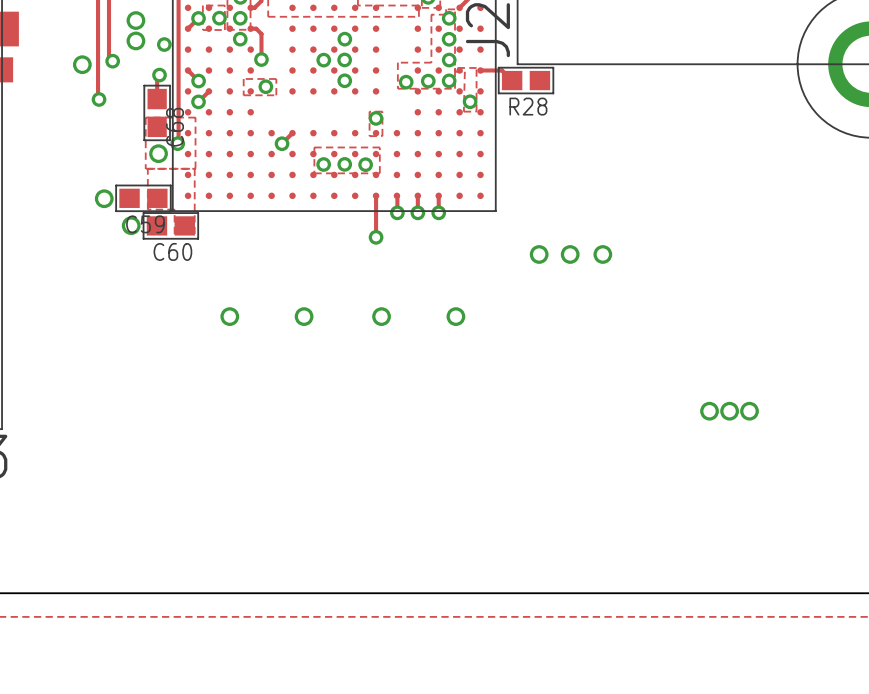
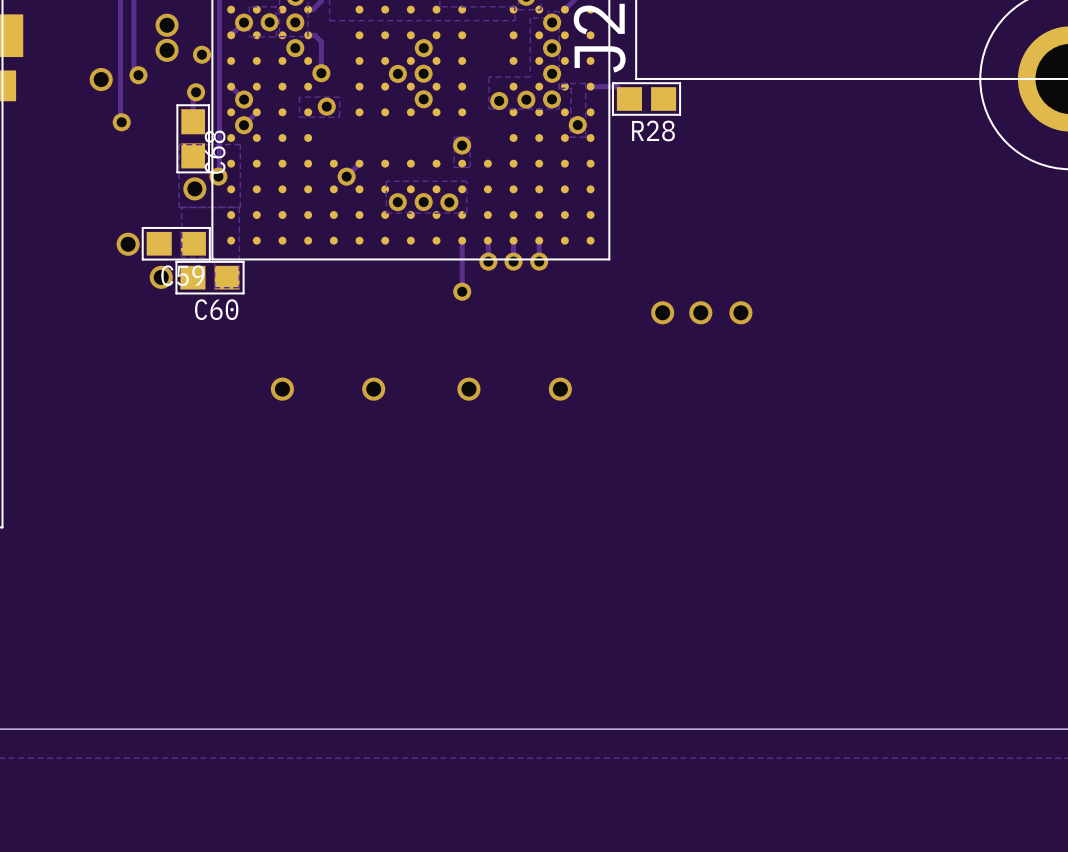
via: (709, 411) -> none
via: (729, 411) -> none
via: (749, 411) -> none

